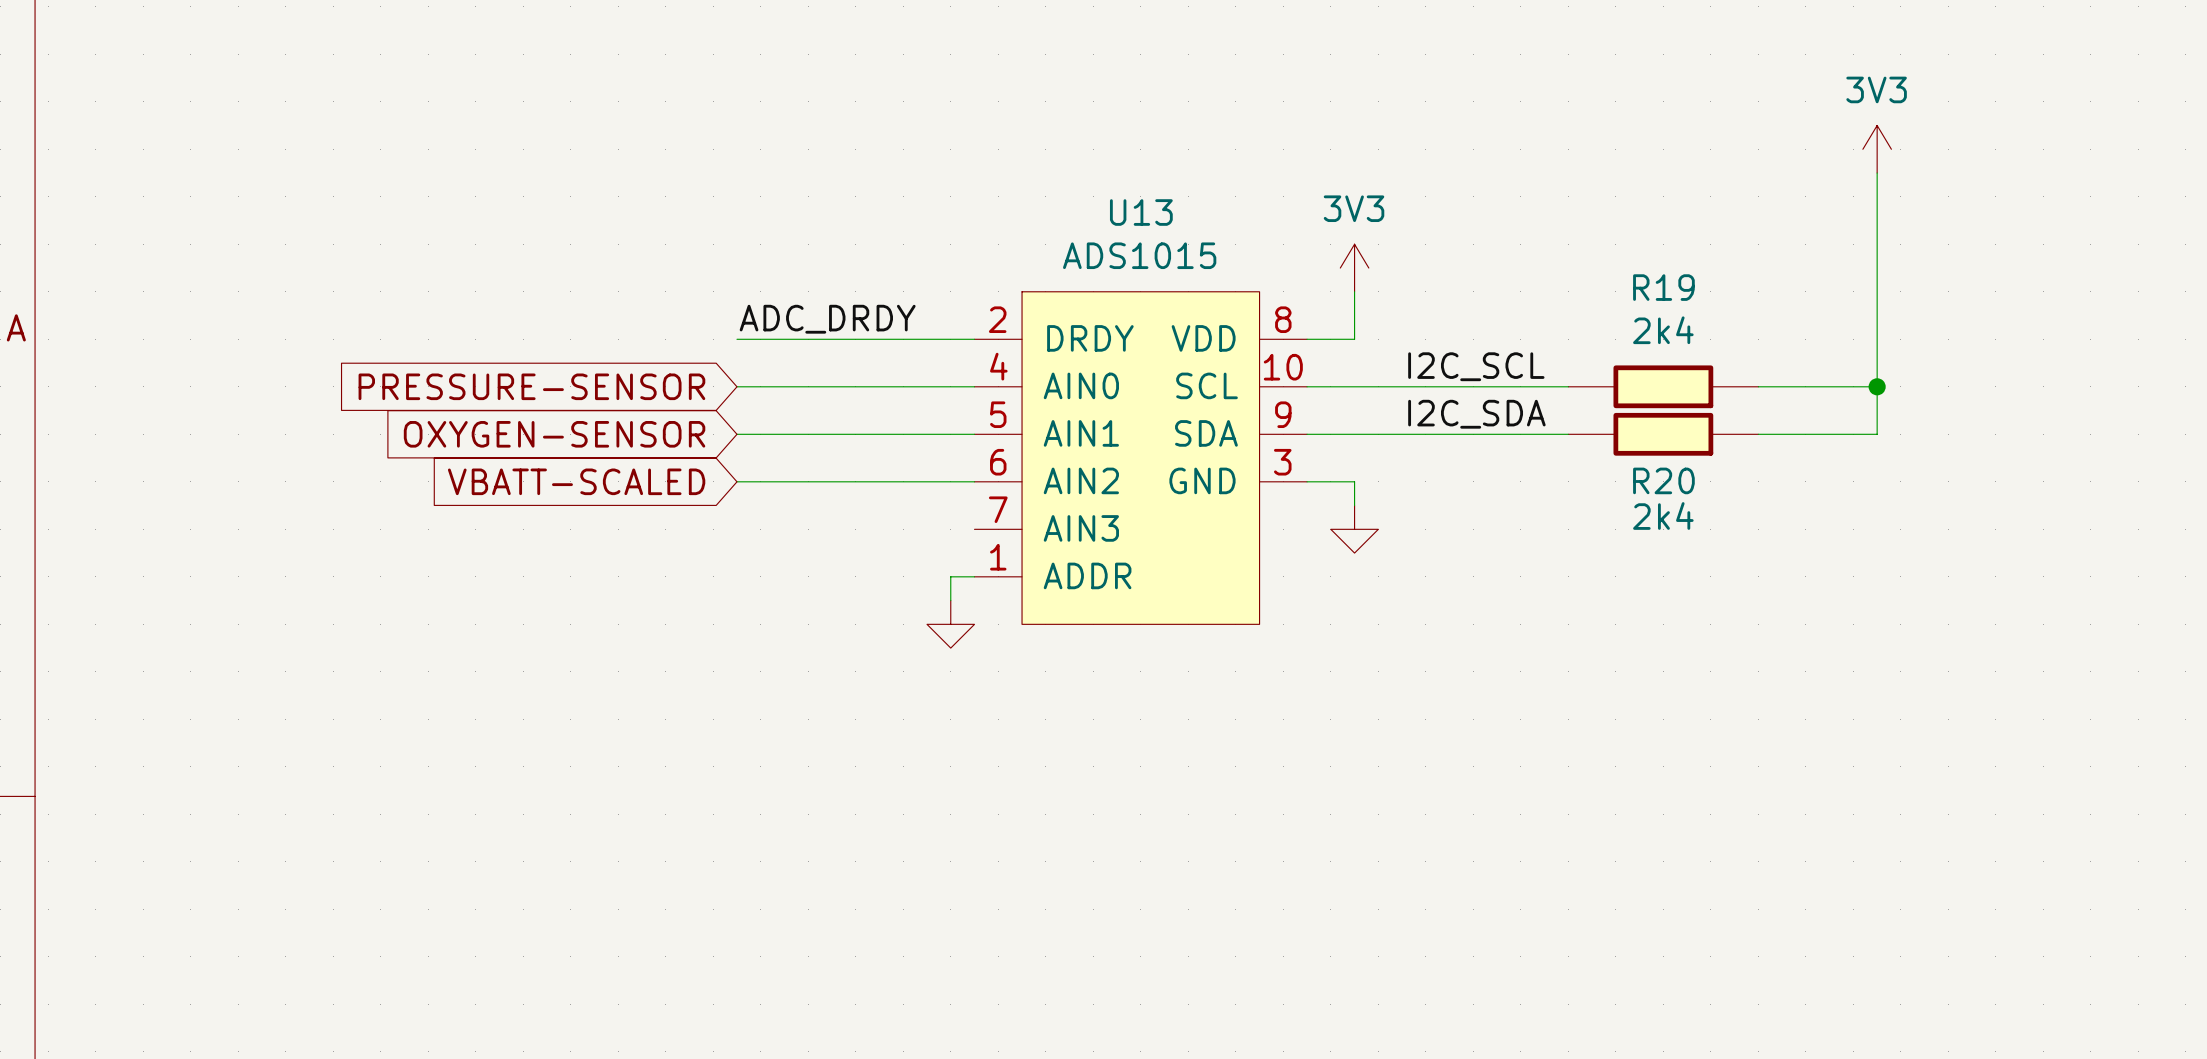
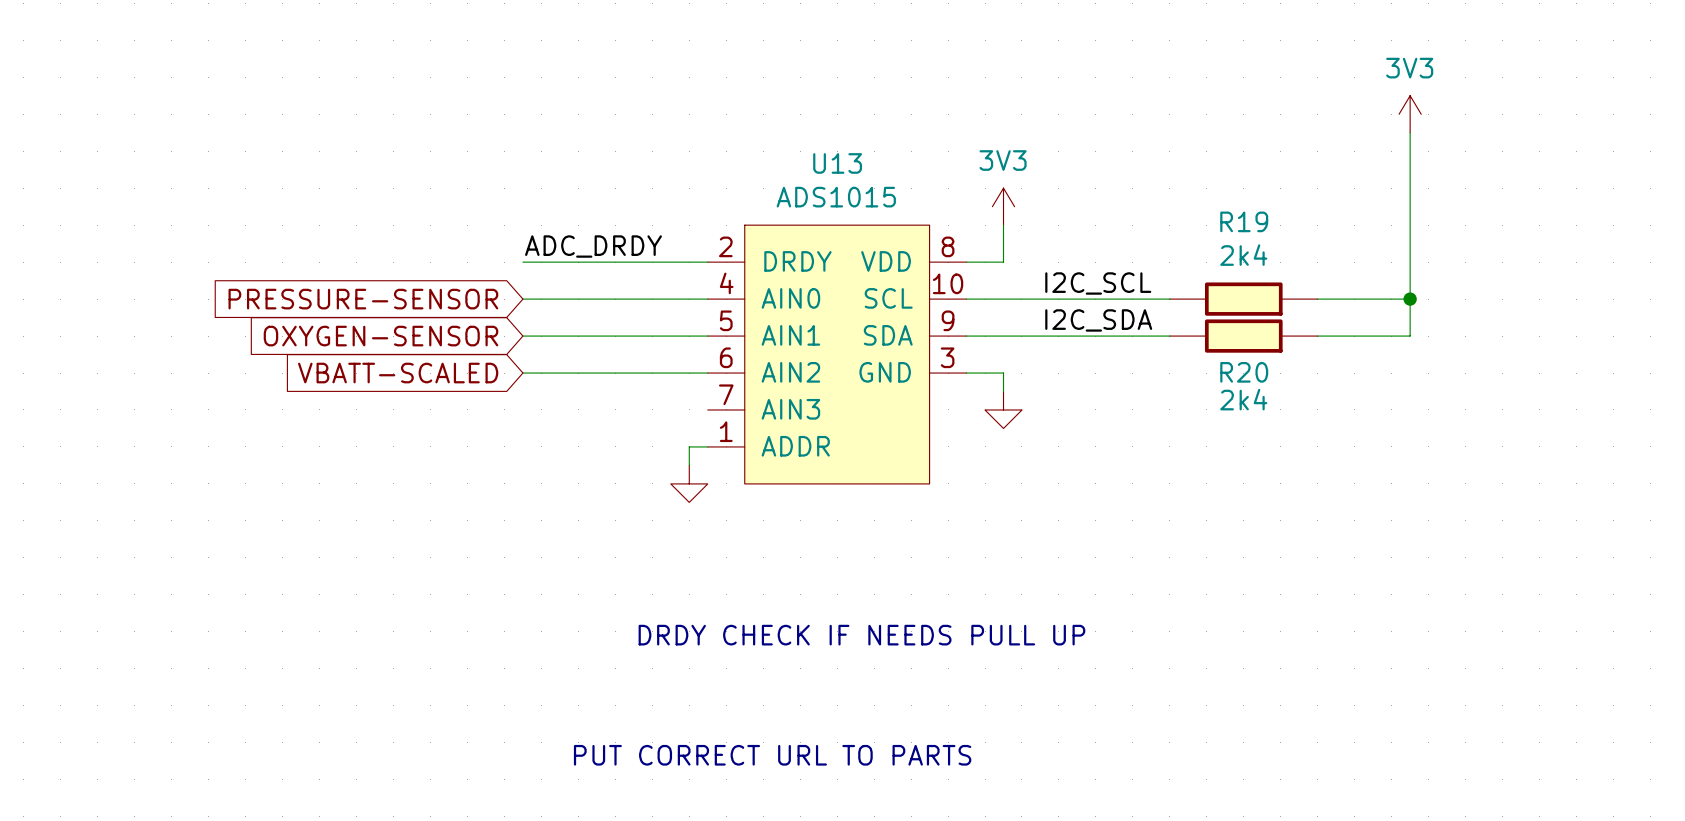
text: none -> DRDY CHECK IF NEEDS PULL UP (861, 635)
text: none -> PUT CORRECT URL TO PARTS (772, 755)

